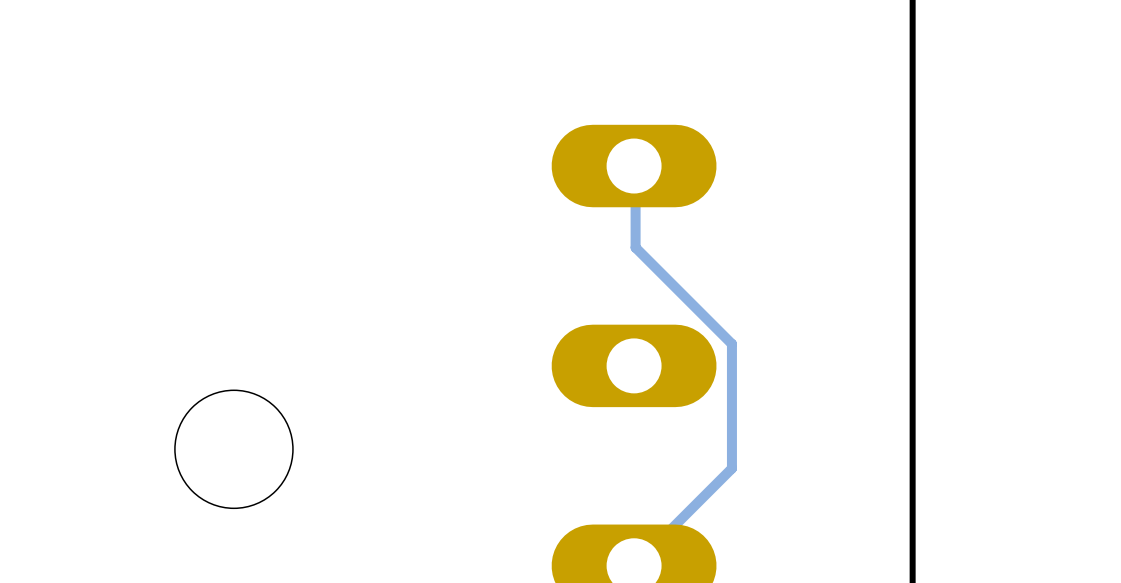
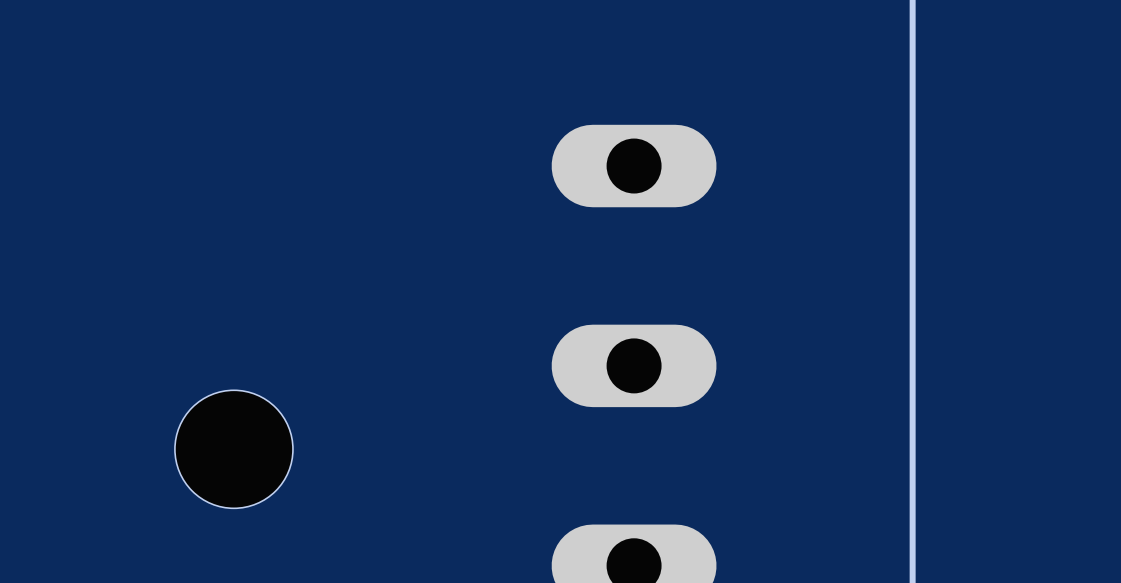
track: (634, 166) (635, 247) (731, 344) (731, 468) (634, 565) -> none

